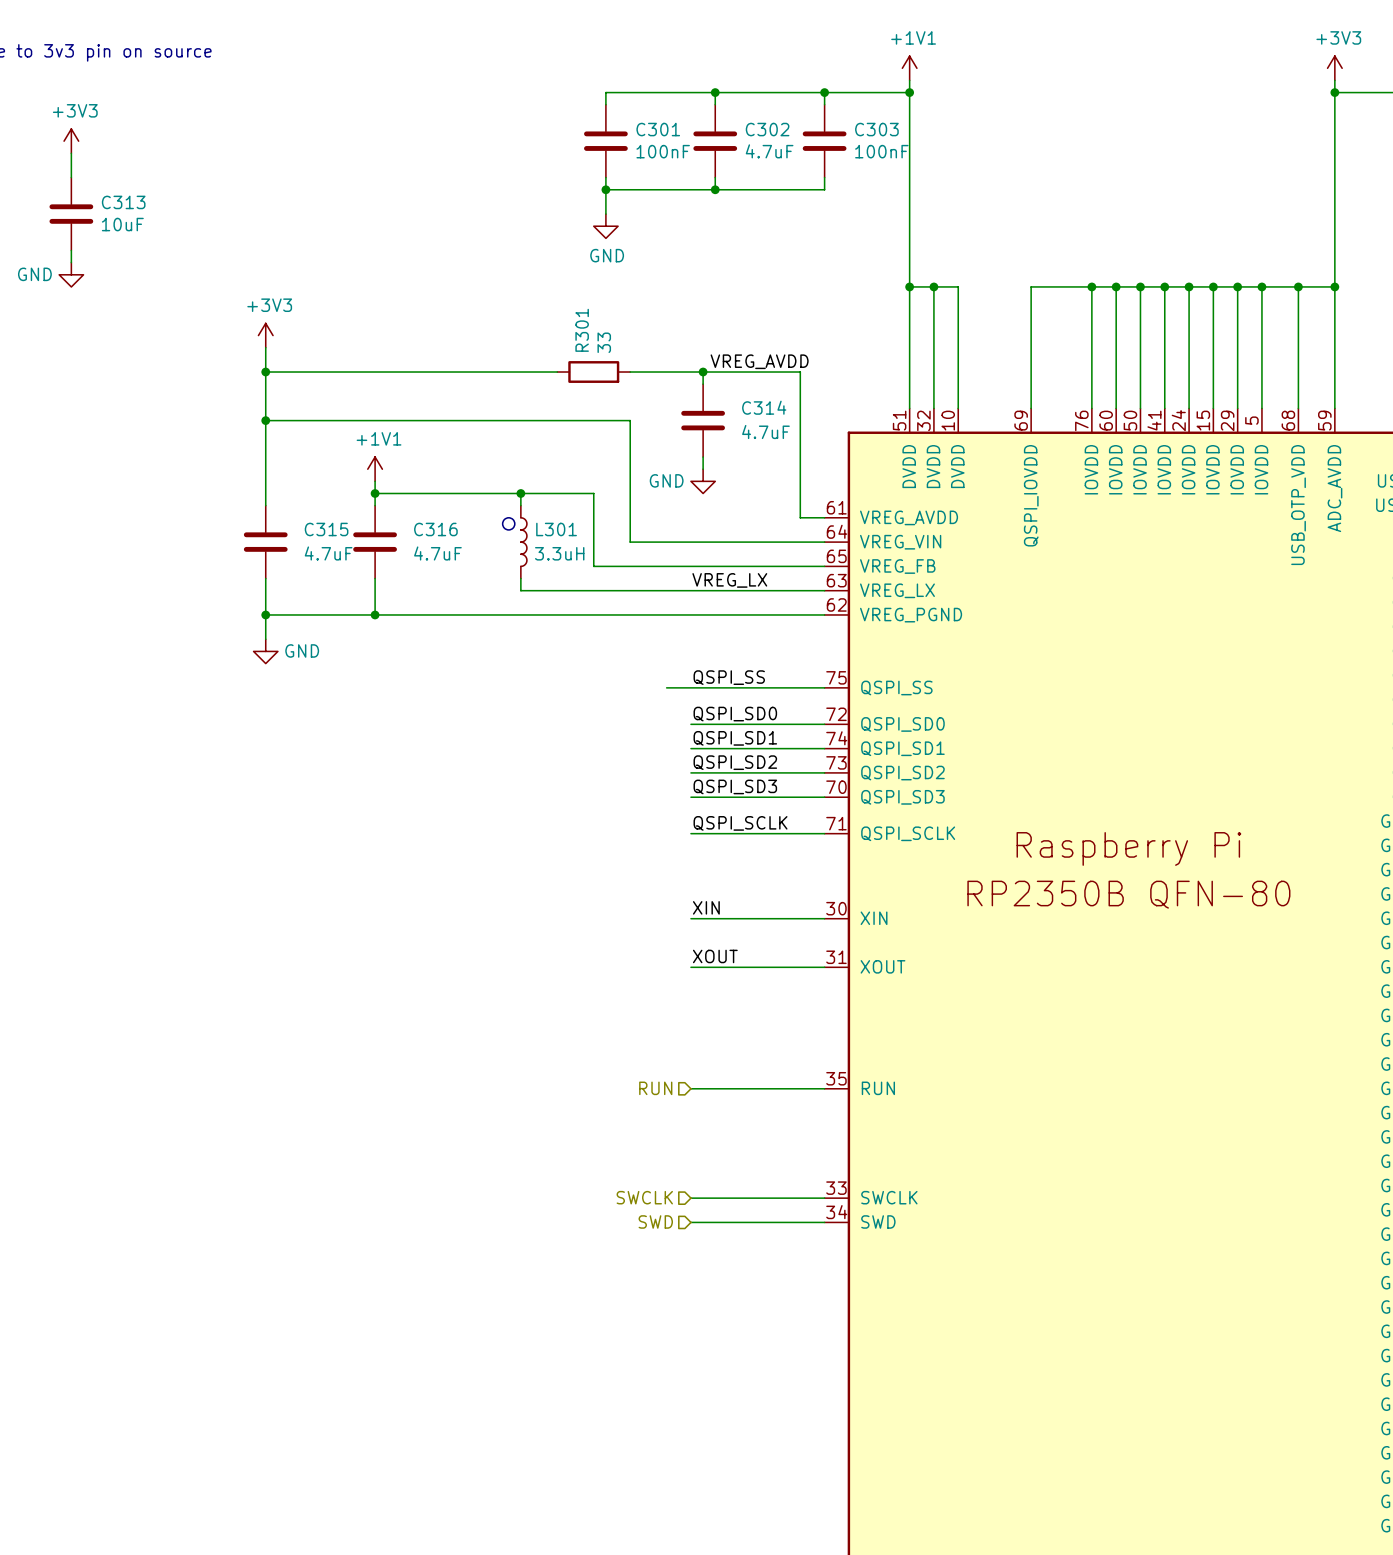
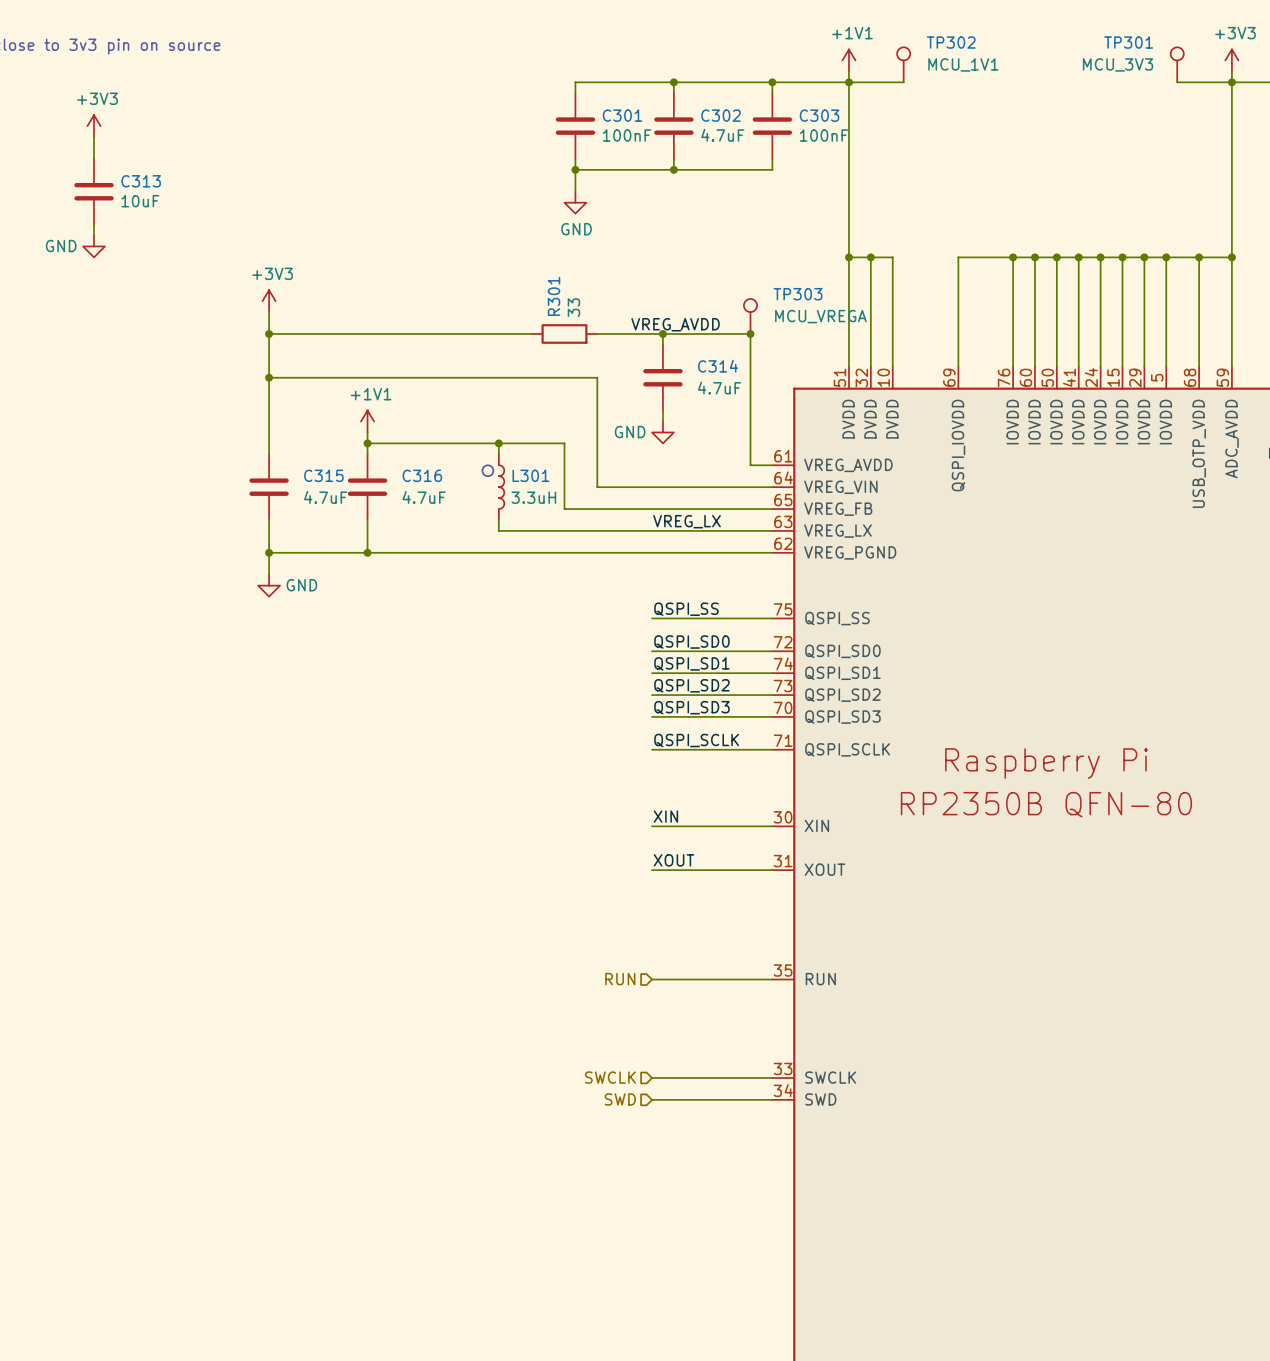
TP302: none -> MCU_1V1 (903, 64)
TP301: none -> MCU_3V3 (1177, 64)
wire: none -> (848, 82) (903, 82)
wire: none -> (1177, 82) (1231, 82)
TP303: none -> MCU_VREGA (750, 316)
label position: VREG_AVDD (759, 361) -> VREG_AVDD (675, 324)
junction: none -> (750, 333)
wire: (666, 687) (690, 687) -> none

